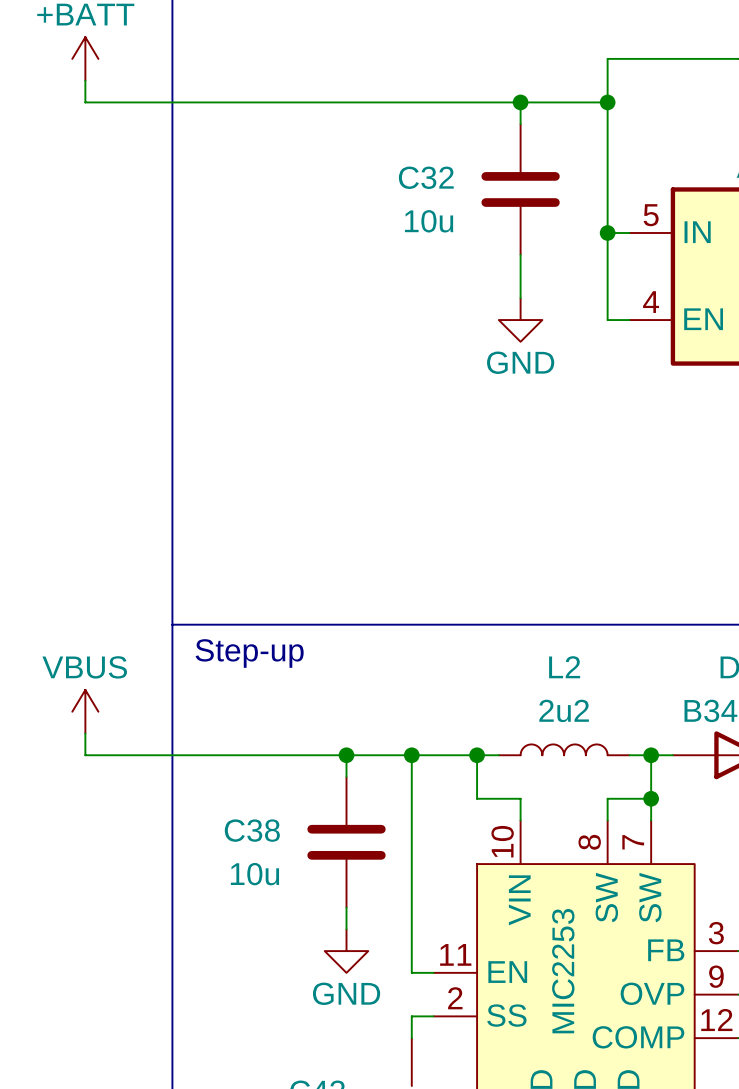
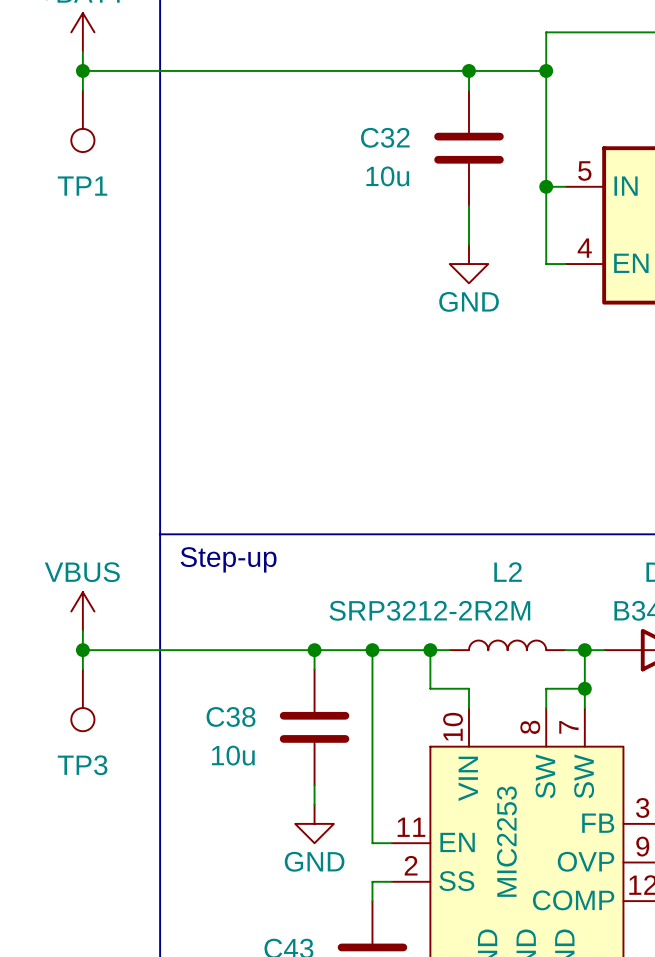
wire: none -> (82, 70) (82, 90)
junction: none -> (82, 70)
TP1: none -> (82, 121)
L2 value: 2u2 (564, 710) -> SRP3212-2R2M (429, 610)
wire: none -> (82, 650) (82, 669)
junction: none -> (82, 650)
TP3: none -> (82, 700)

